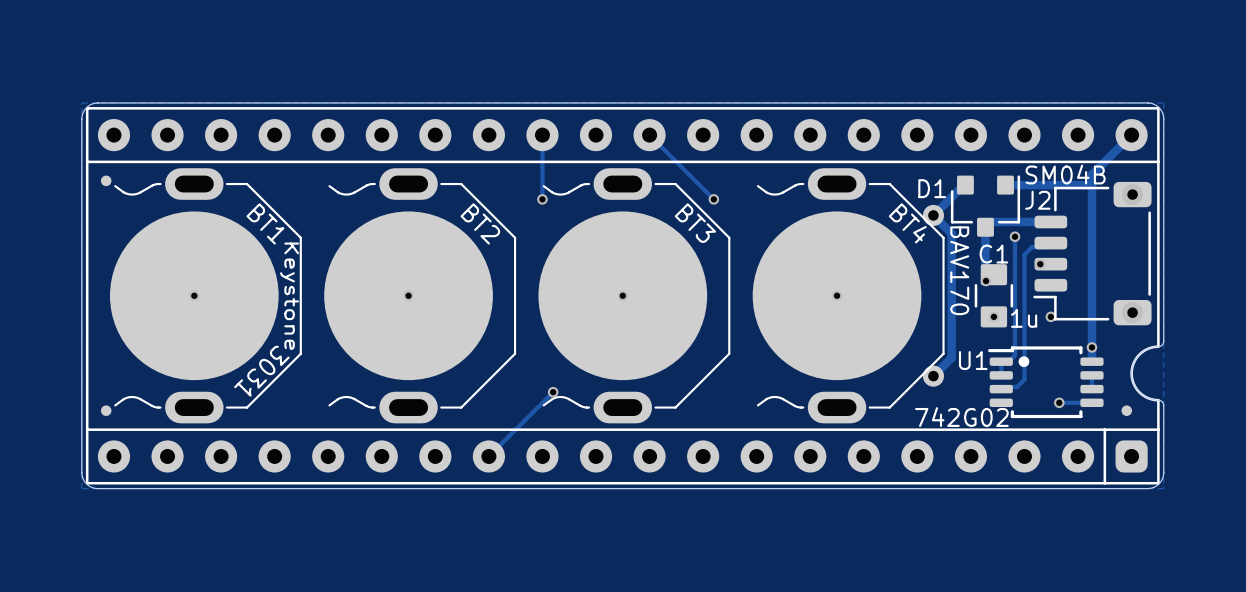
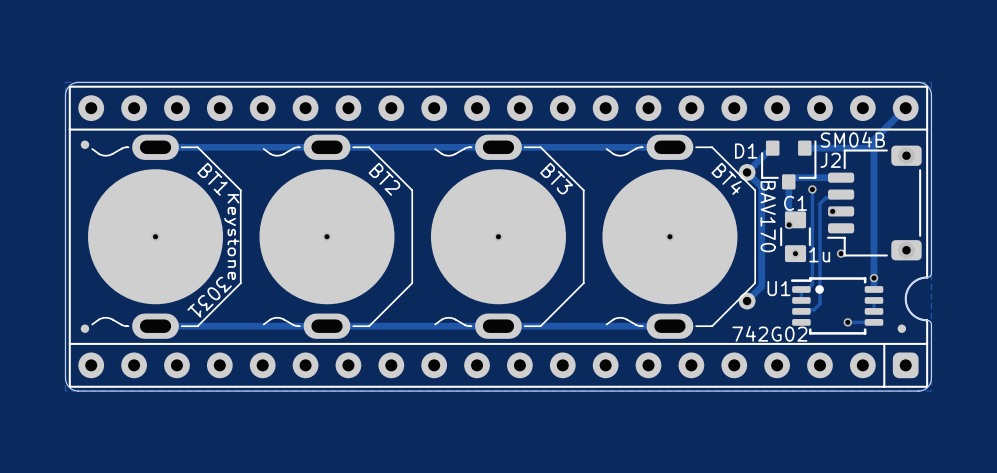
track: (542, 135) (542, 199) -> none
track: (649, 135) (713, 199) -> none
track: none -> (669, 147) (155, 147)
via: (542, 199) -> none
via: (713, 199) -> none
track: (553, 392) (488, 456) -> none
via: (553, 392) -> none
track: none -> (669, 326) (155, 326)

